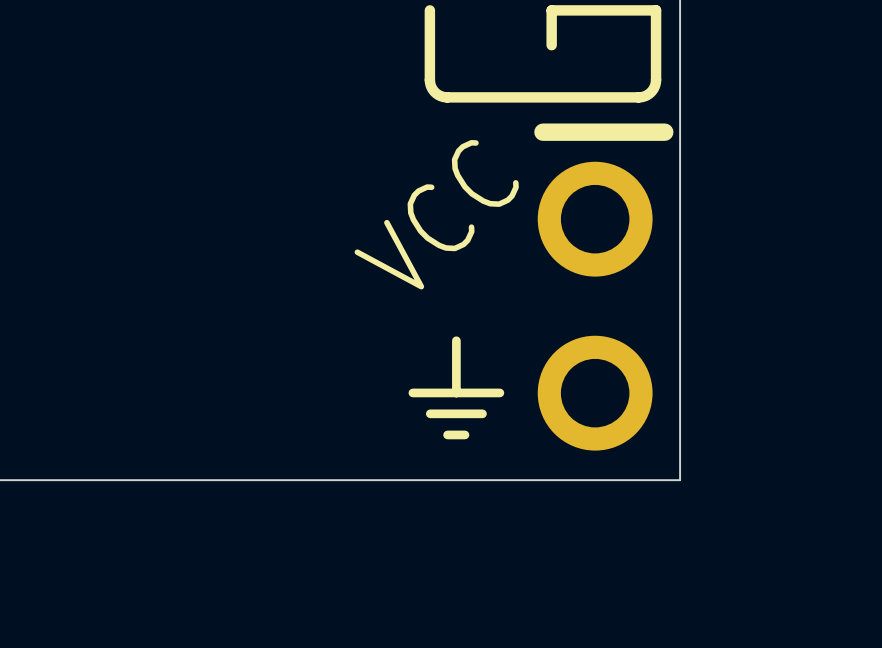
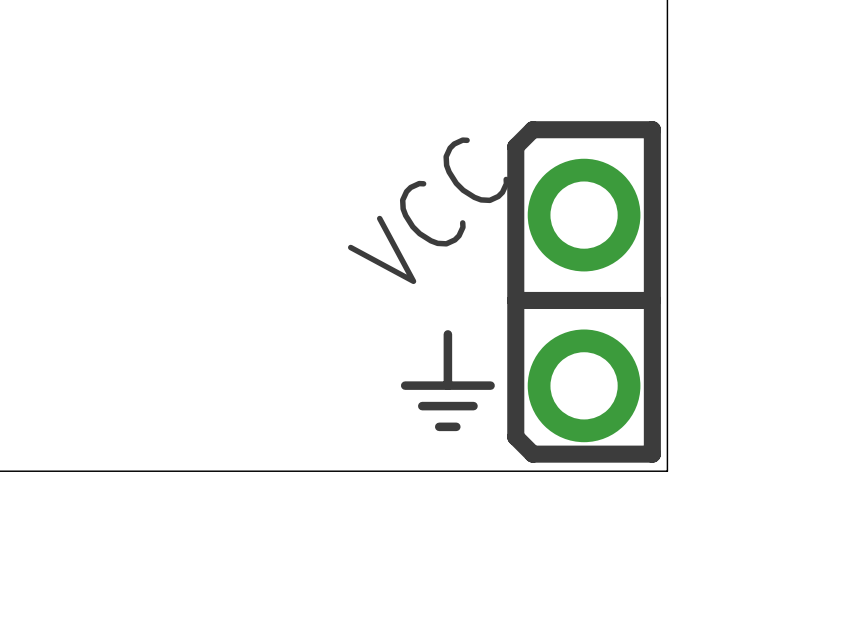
line: (429, 10) (430, 82) (433, 90) (440, 96) (638, 97) (647, 95) (654, 86) (656, 10) (551, 10) (551, 45) -> none
line: none -> (532, 129) (515, 146) (515, 437) (532, 454) (652, 454) (652, 129)
line: none -> (515, 300) (652, 300)

